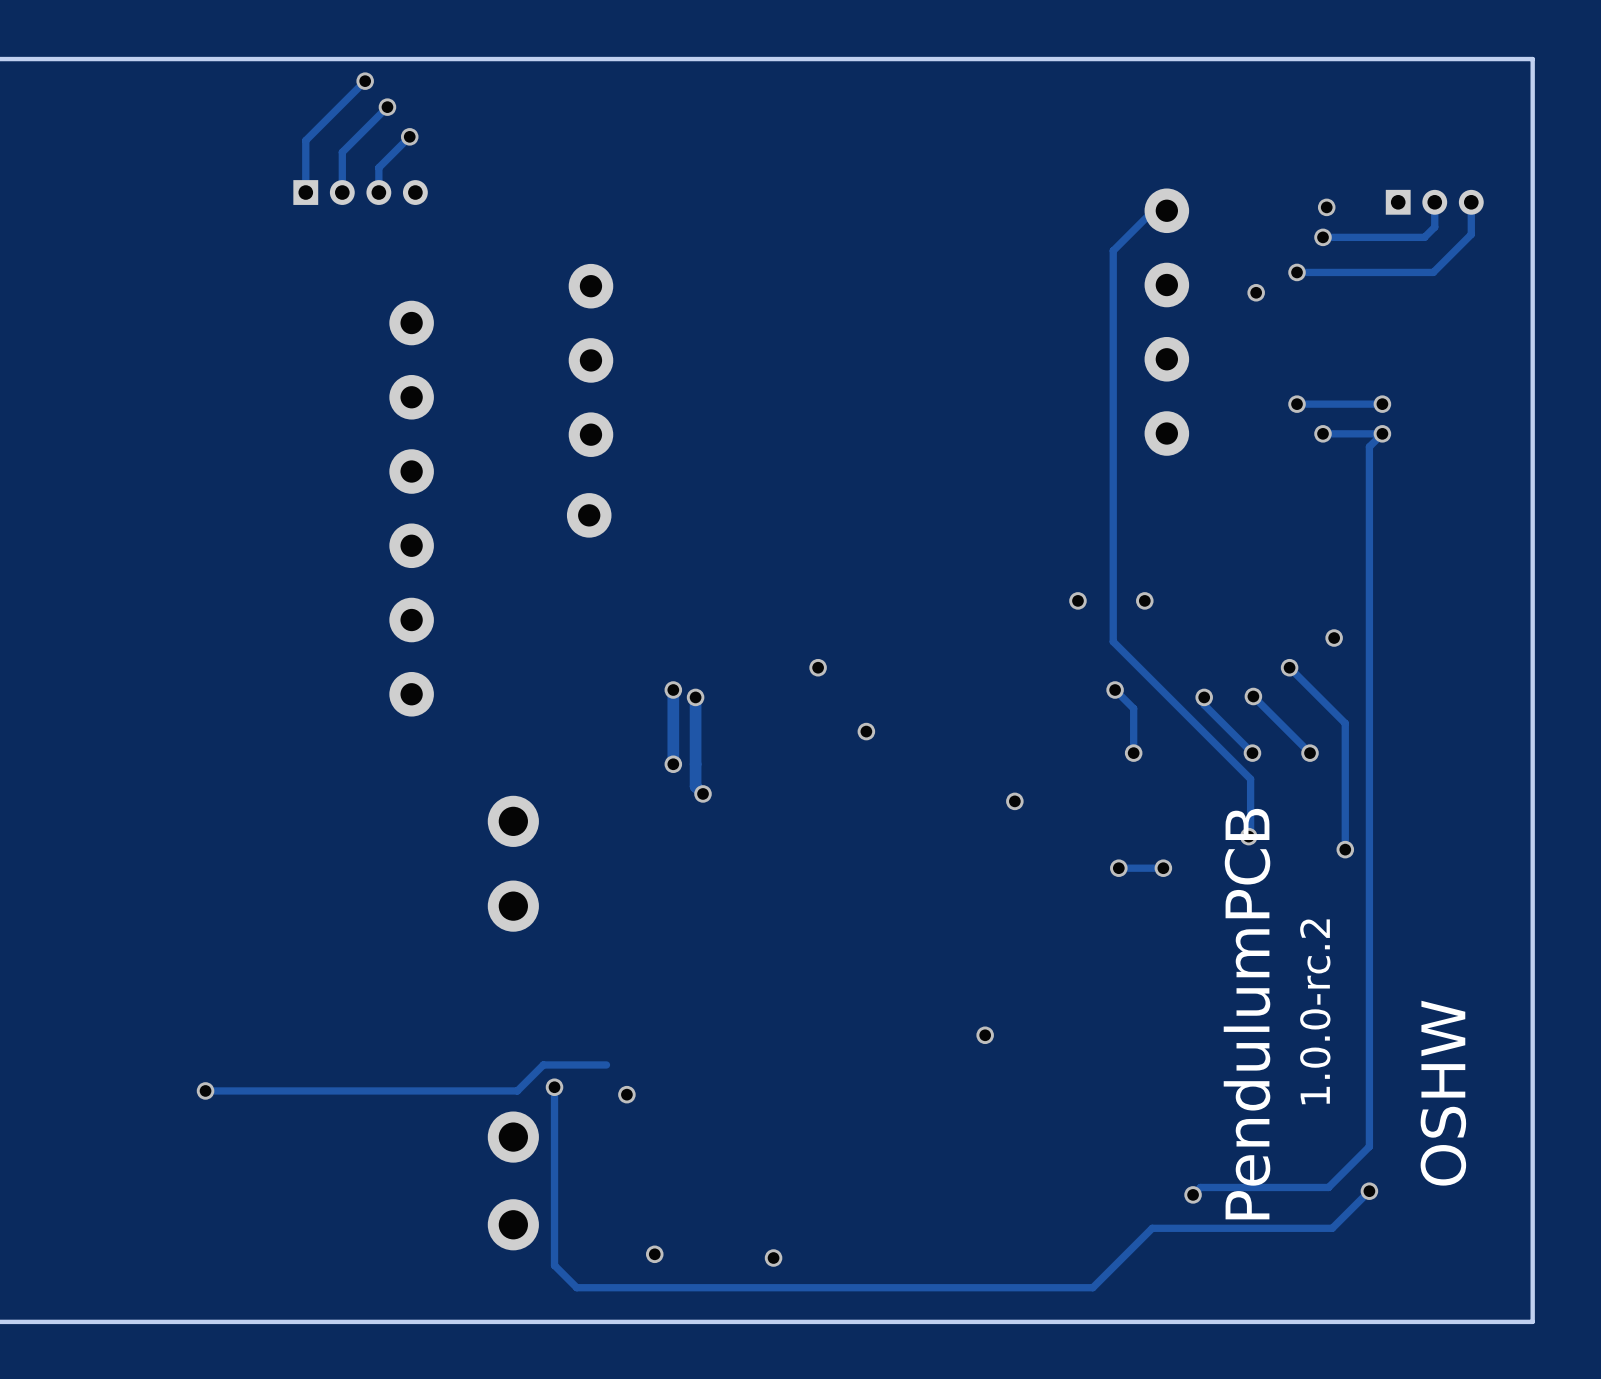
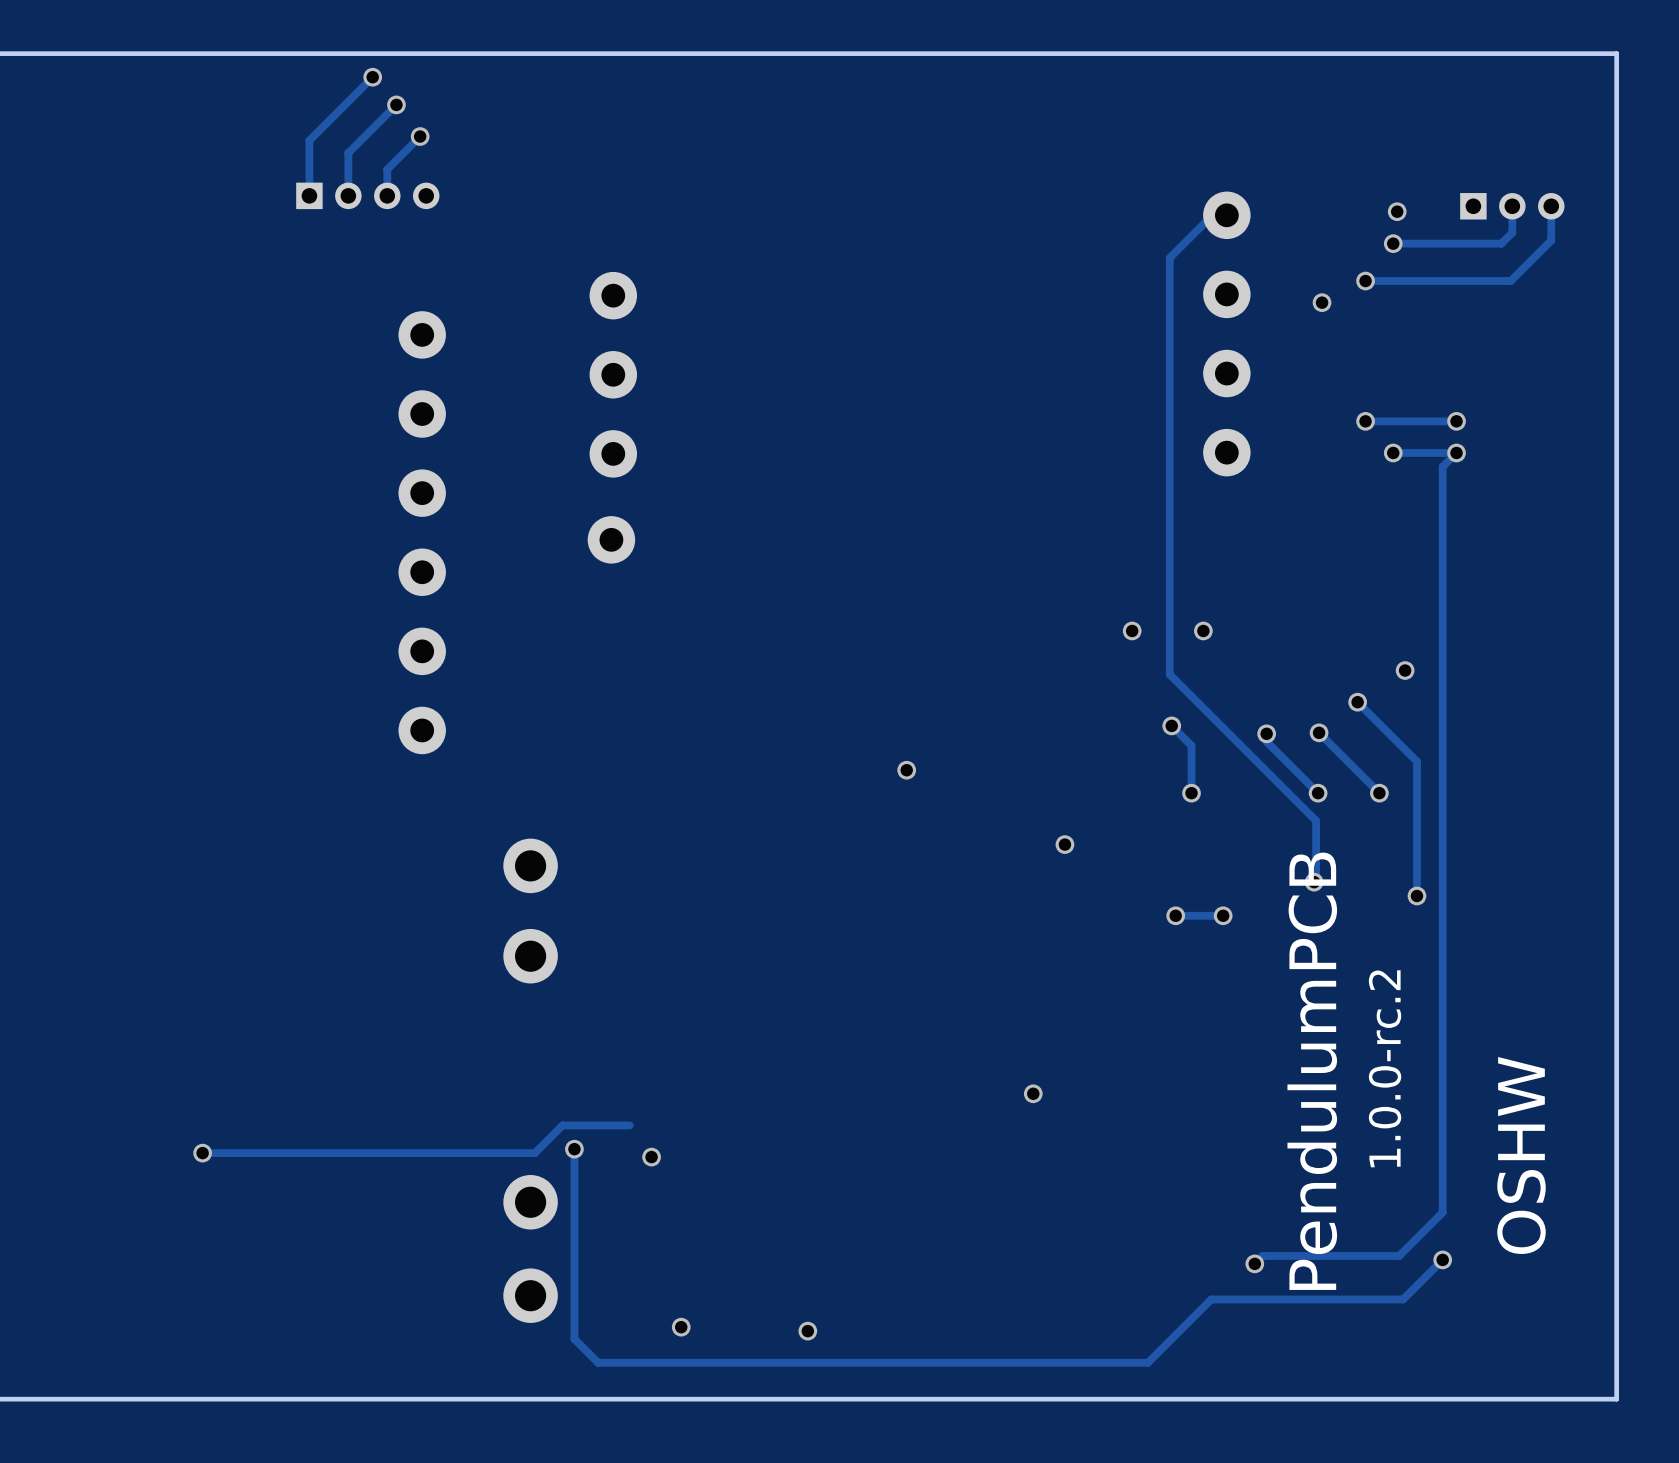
via: (818, 667) -> none
track: (673, 690) (673, 764) -> none
via: (673, 690) -> none
track: (695, 697) (695, 786) (703, 793) -> none
via: (695, 697) -> none
via: (673, 764) -> none
via: (703, 793) -> none

